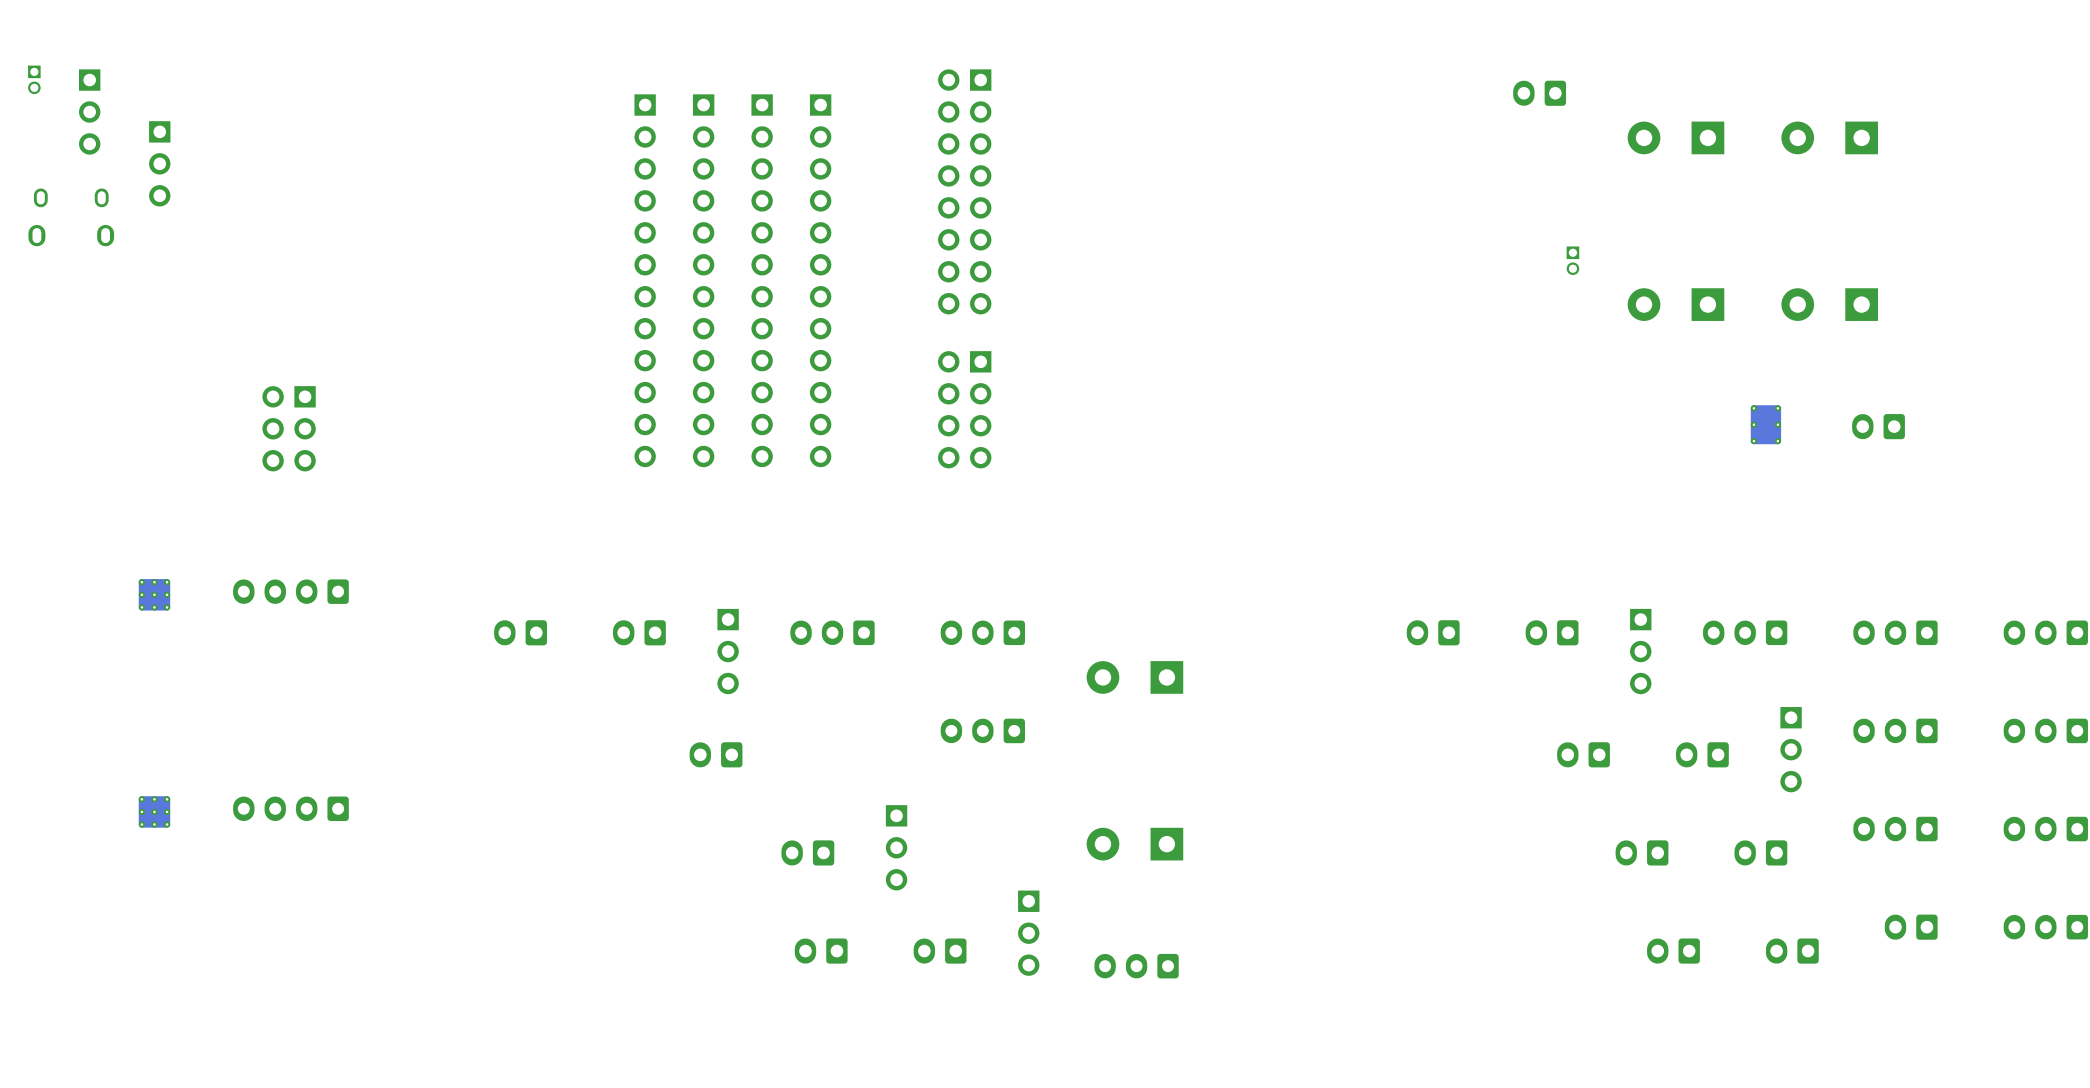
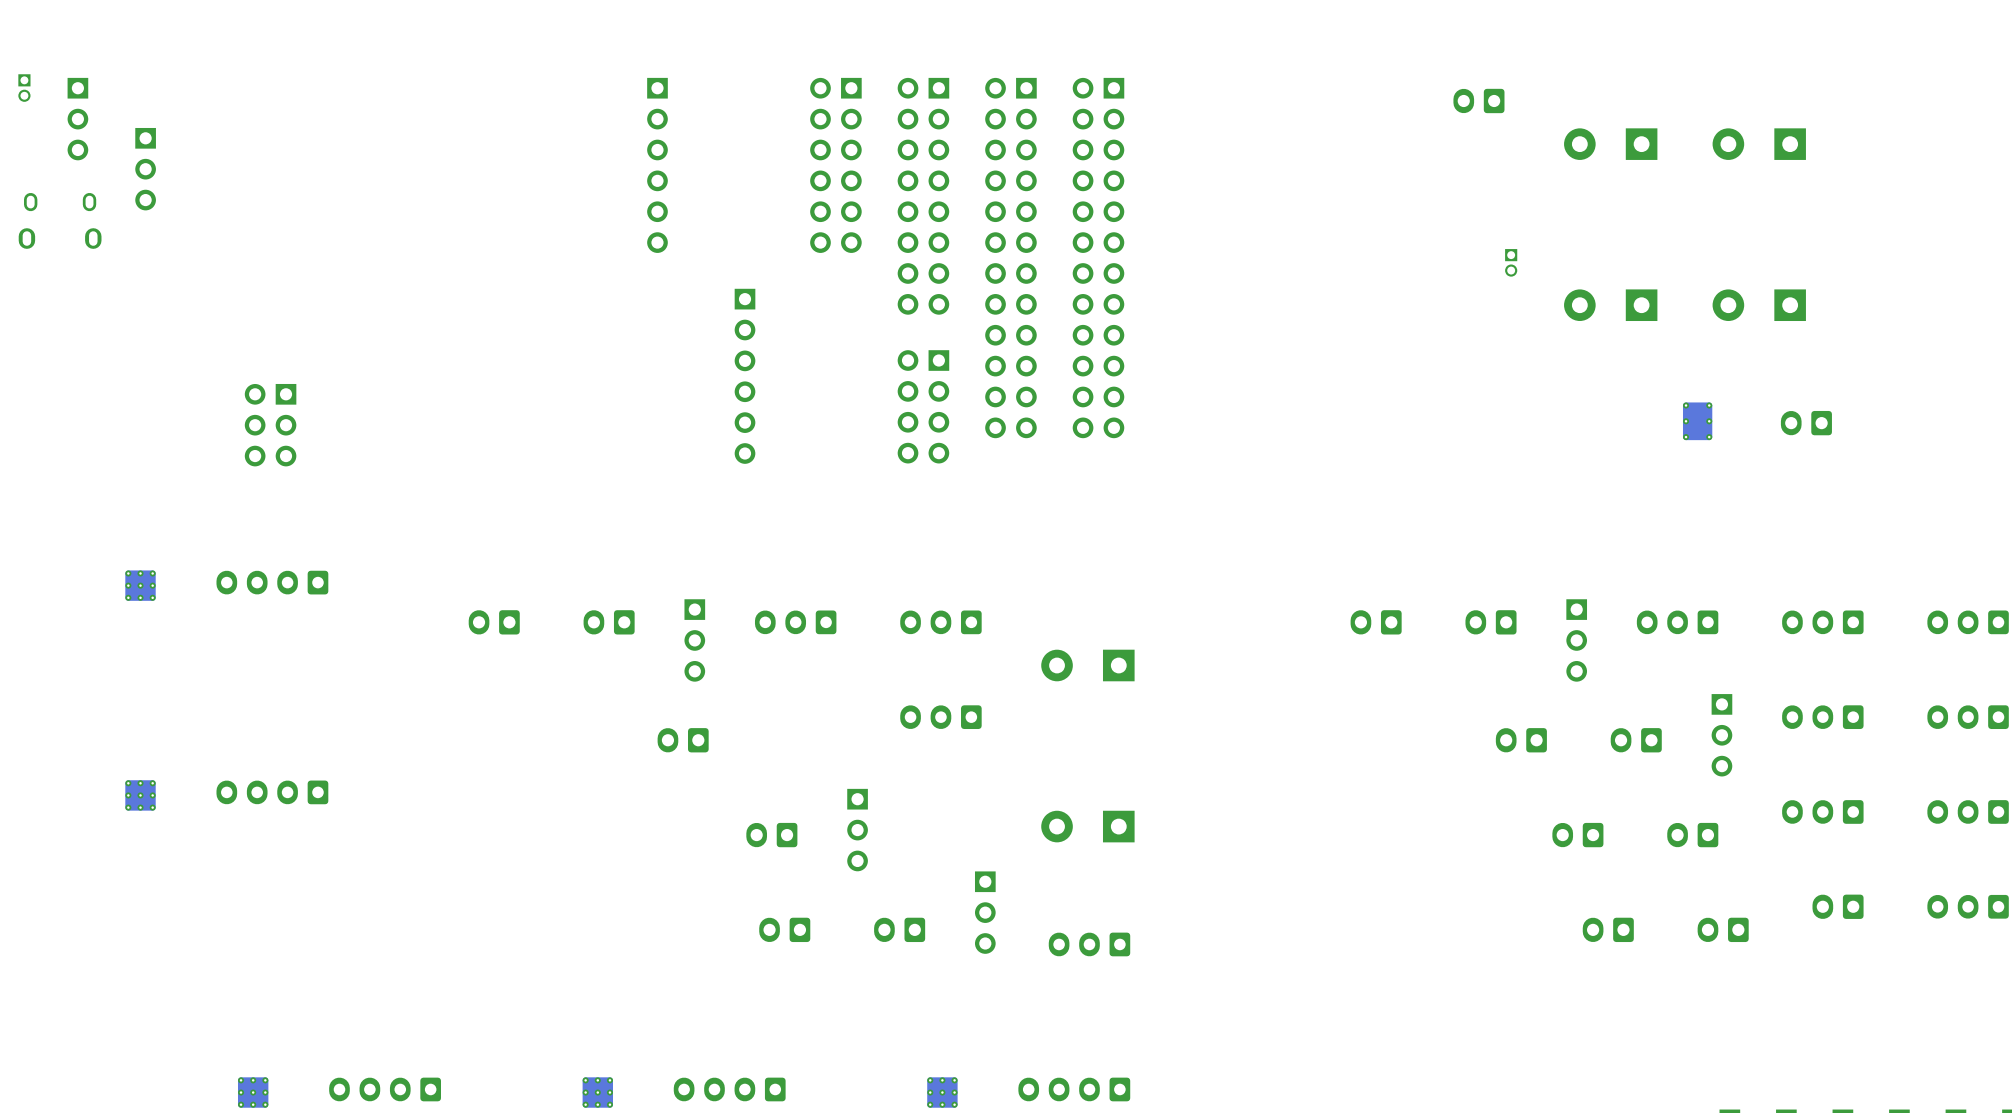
part: none -> (657, 165)
part: none -> (835, 165)
part: none -> (1010, 258)
part: none -> (1098, 258)
part: (645, 280) -> none
part: (703, 280) -> none
part: (762, 280) -> none
part: (820, 280) -> none
part: none -> (745, 376)

